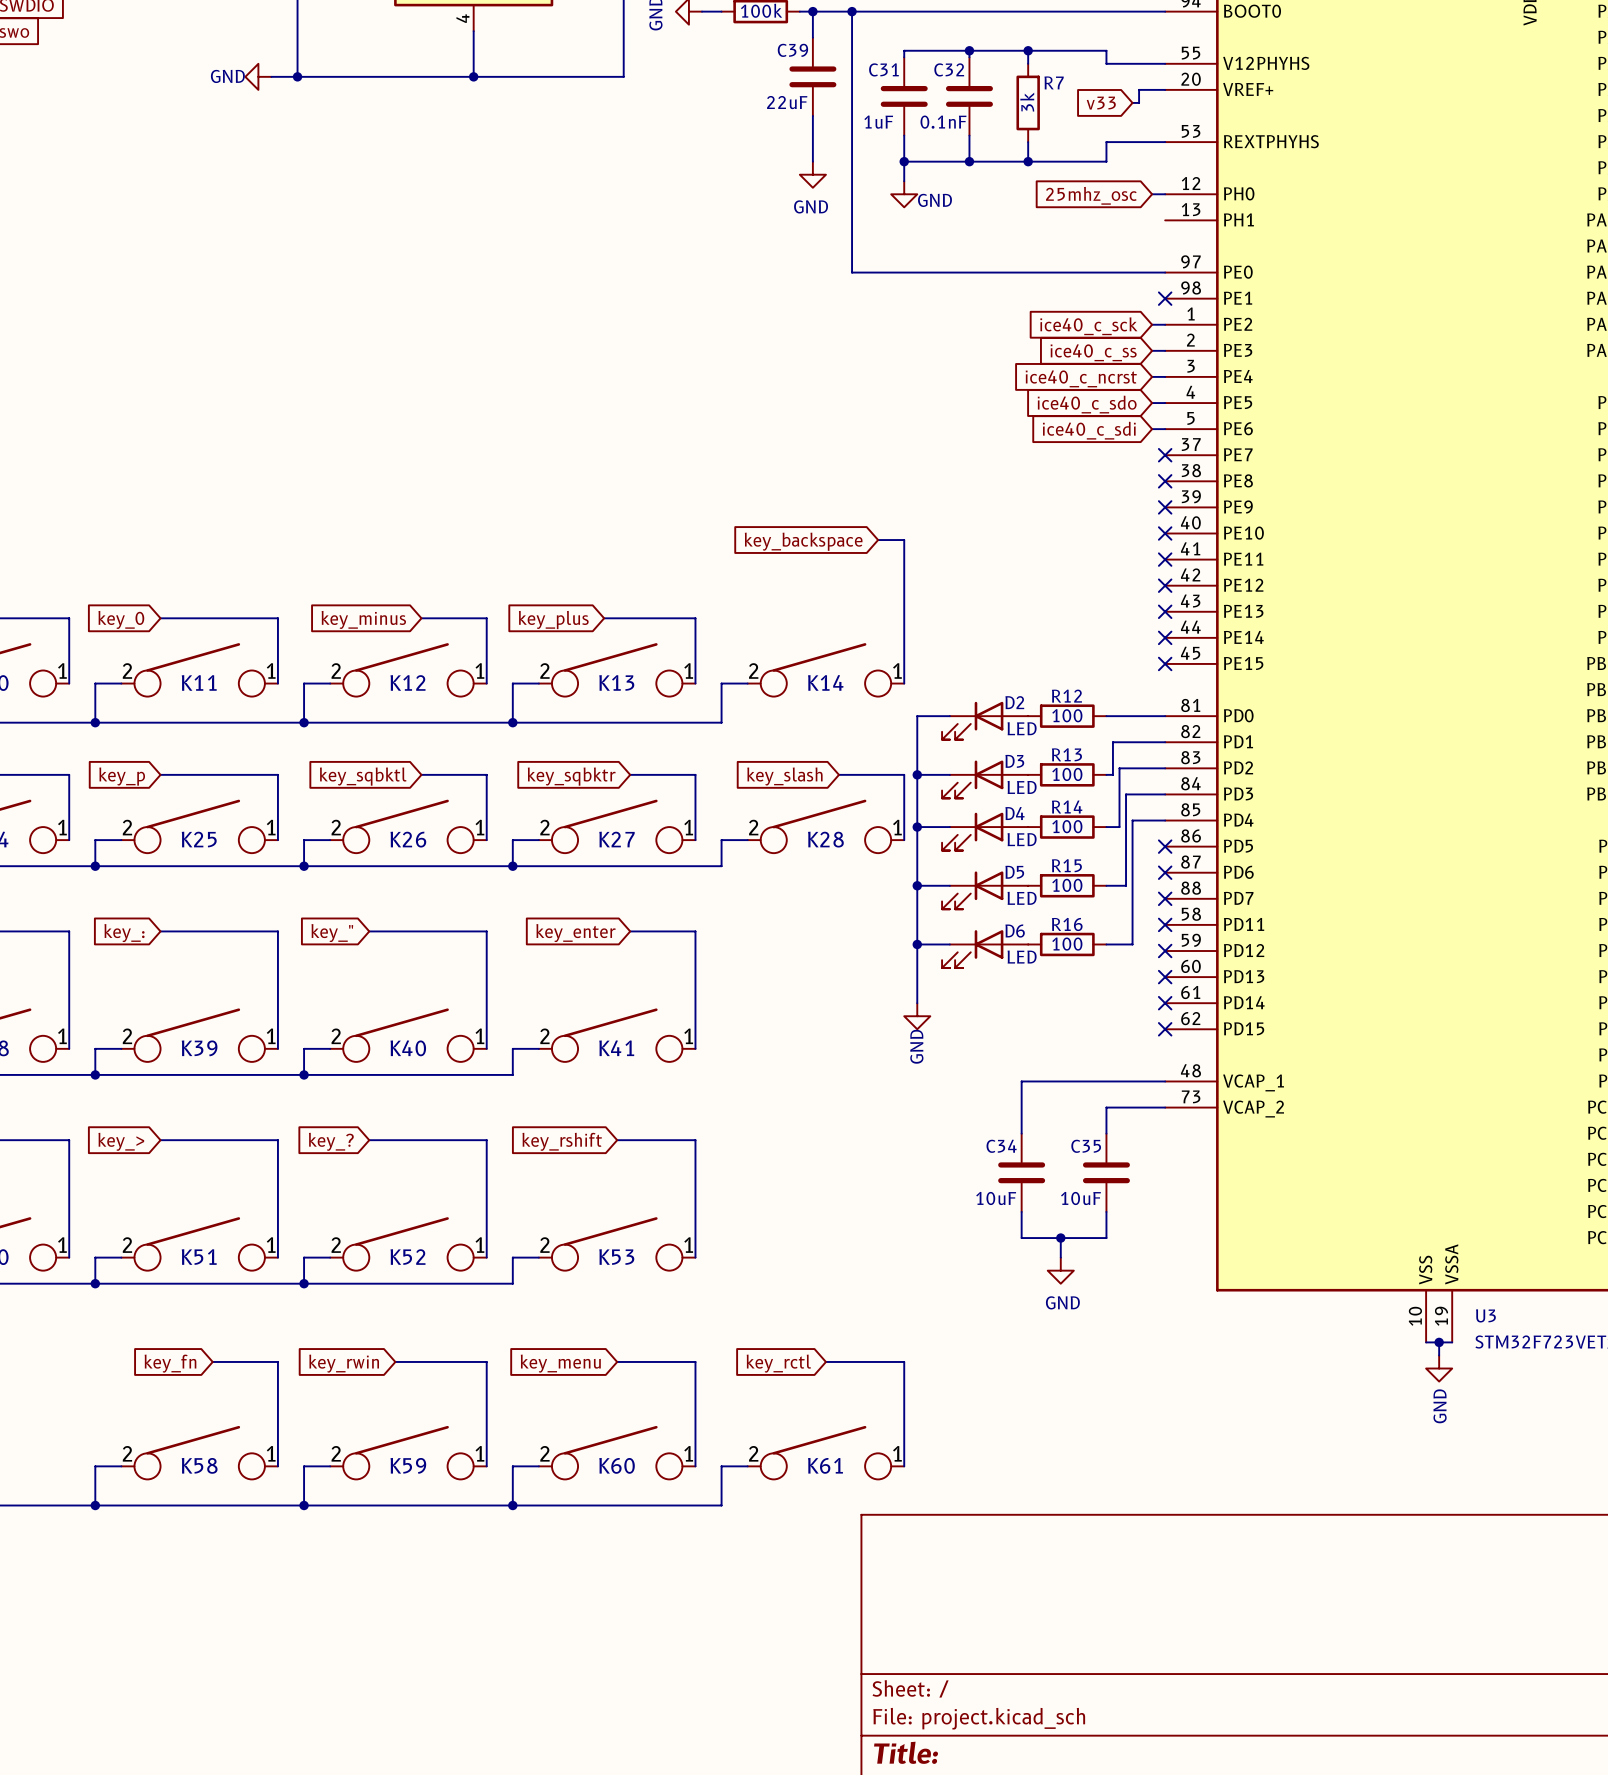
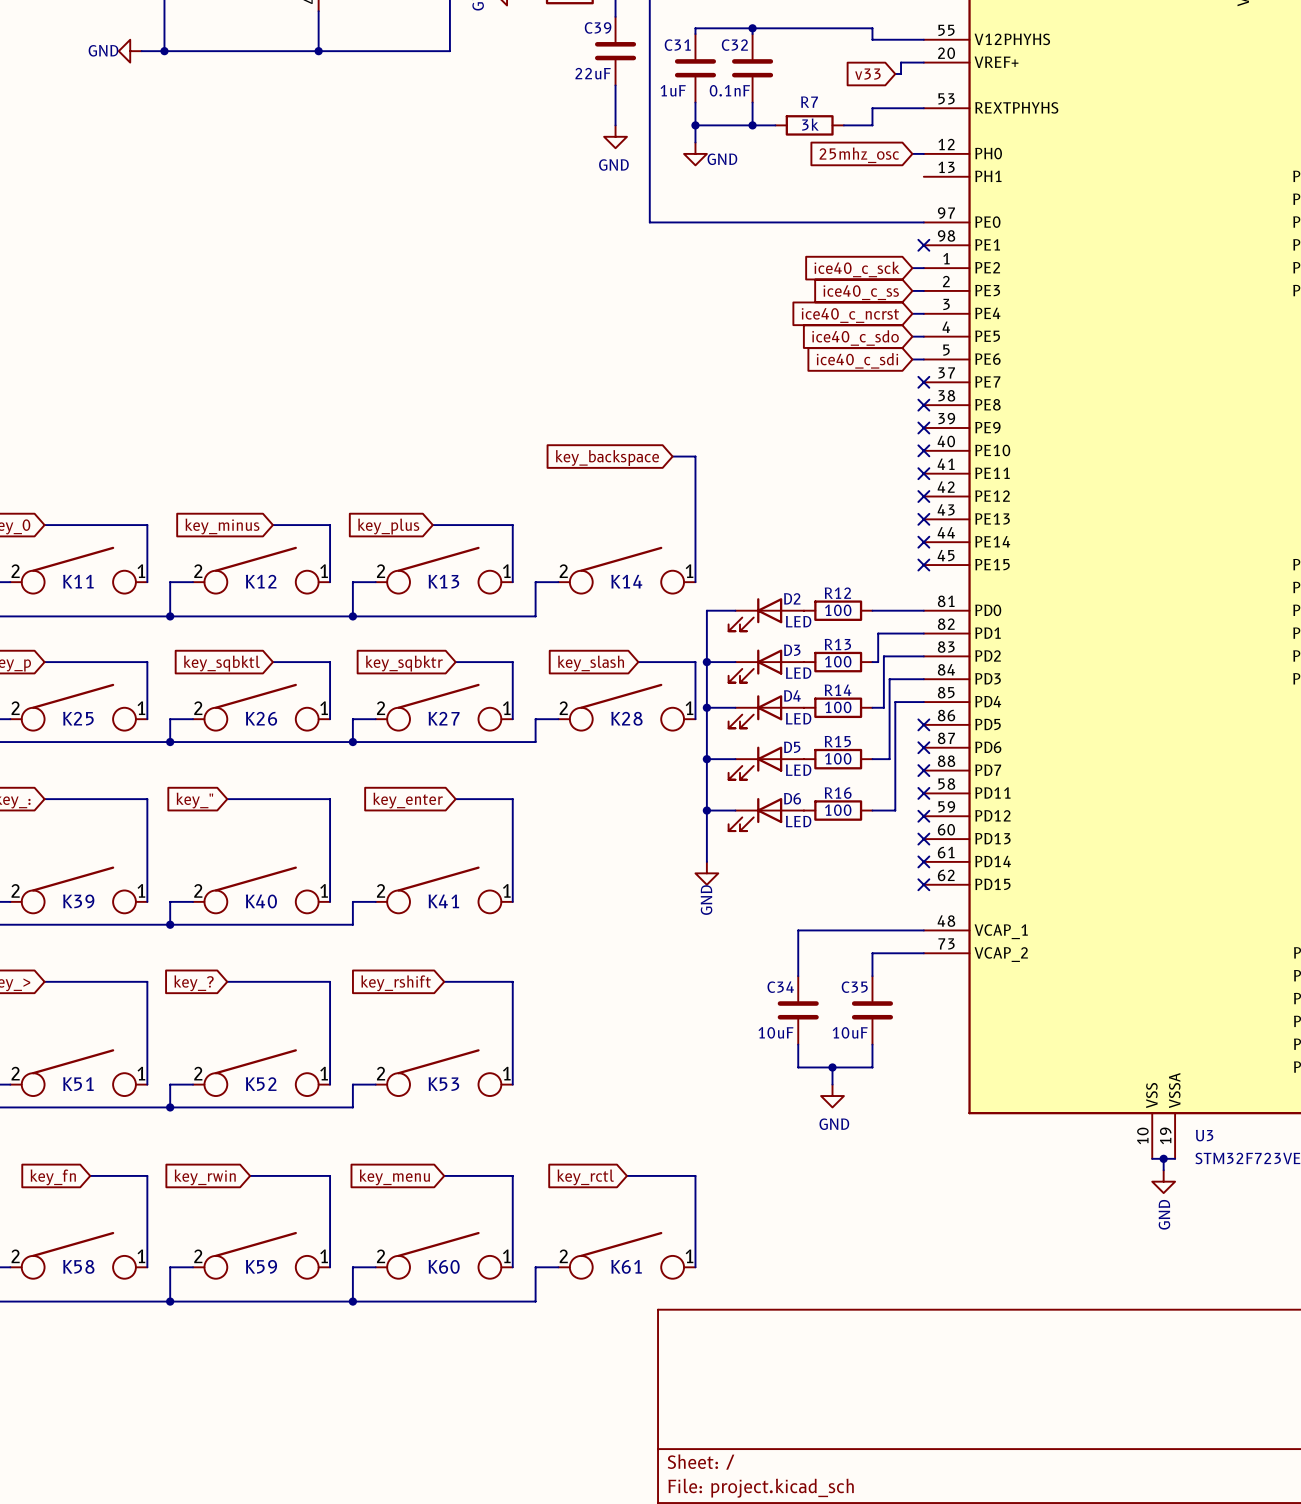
wire: (1028, 50) (1028, 63) -> none
junction: (1028, 50) -> none
R7 name position: R7 (1054, 82) -> R7 (809, 102)
R7 rotation: 0° (1028, 102) -> 90° clockwise (809, 125)
R7 position: (1028, 102) -> (809, 125)
wire: (1028, 142) (1028, 161) -> none
wire: (995, 161) (1073, 161) -> none
junction: (1028, 161) -> none

